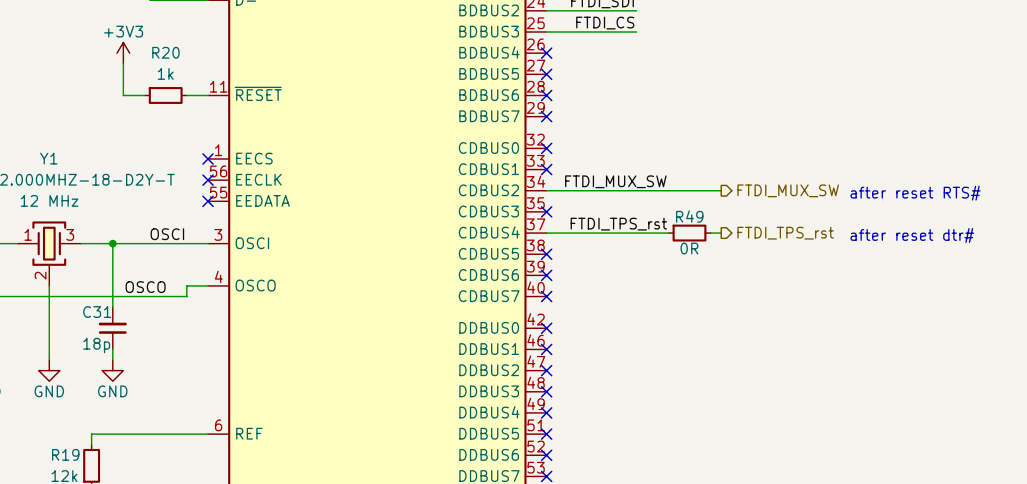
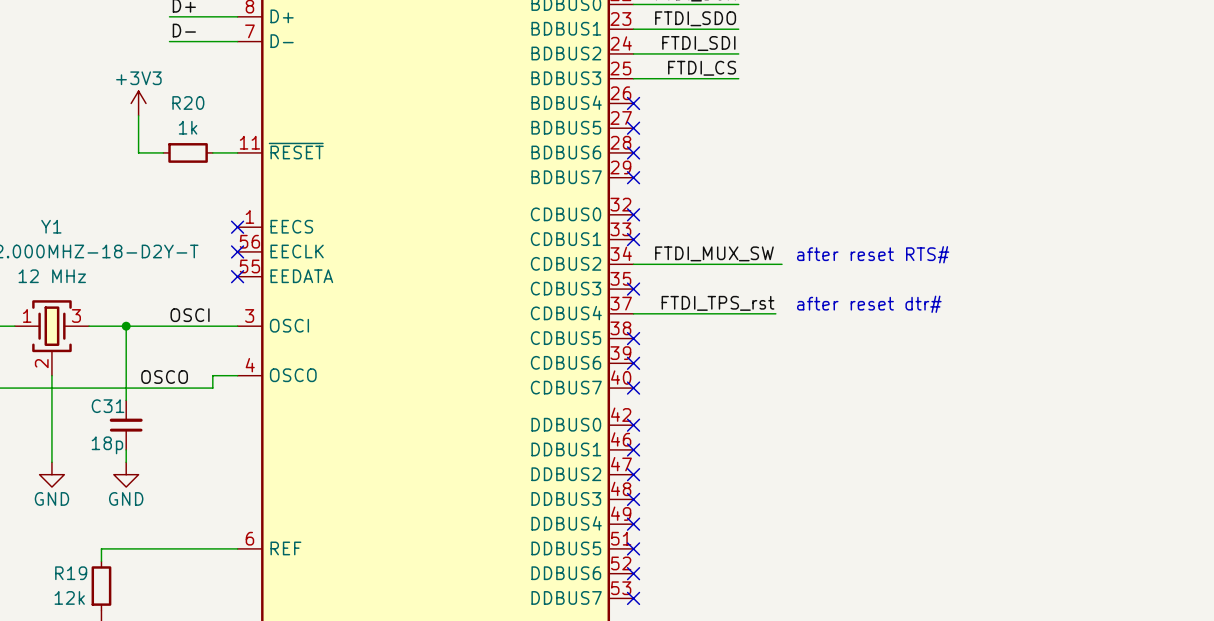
wire: (673, 190) (721, 190) -> none
hierarchical label: FTDI_MUX_SW (788, 190) -> none
text position: after reset RTS# (915, 193) -> after reset RTS# (873, 254)
R49: (689, 233) -> none
wire: (710, 233) (721, 233) -> none
hierarchical label: FTDI_TPS_rst (785, 233) -> none
text position: after reset dtr# (912, 235) -> after reset dtr# (869, 304)

